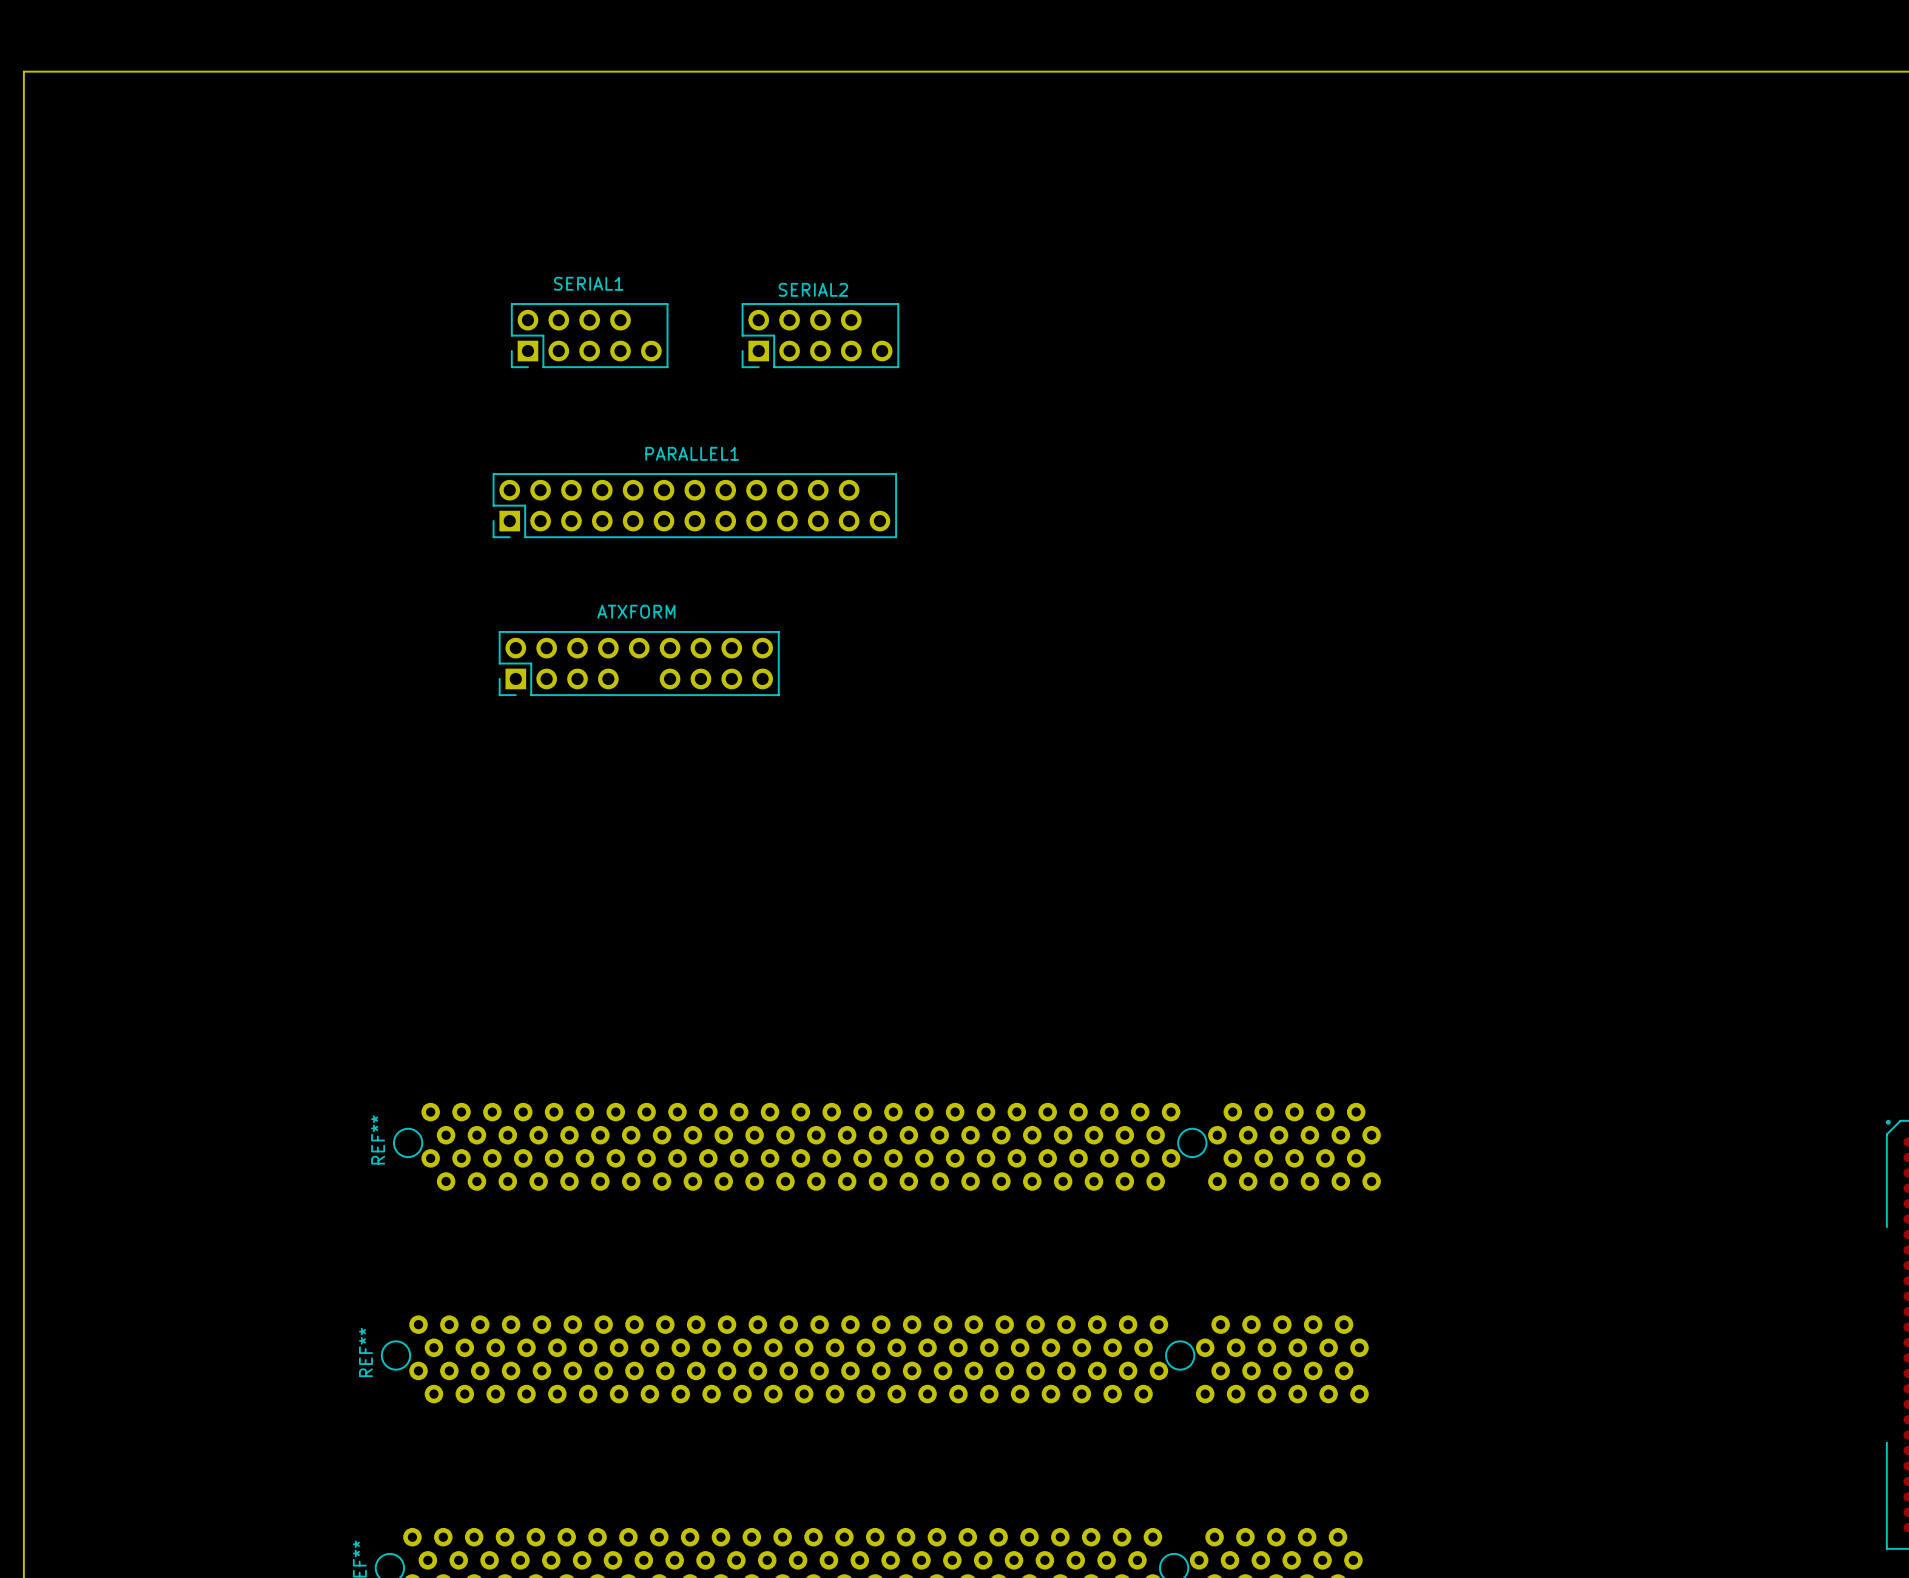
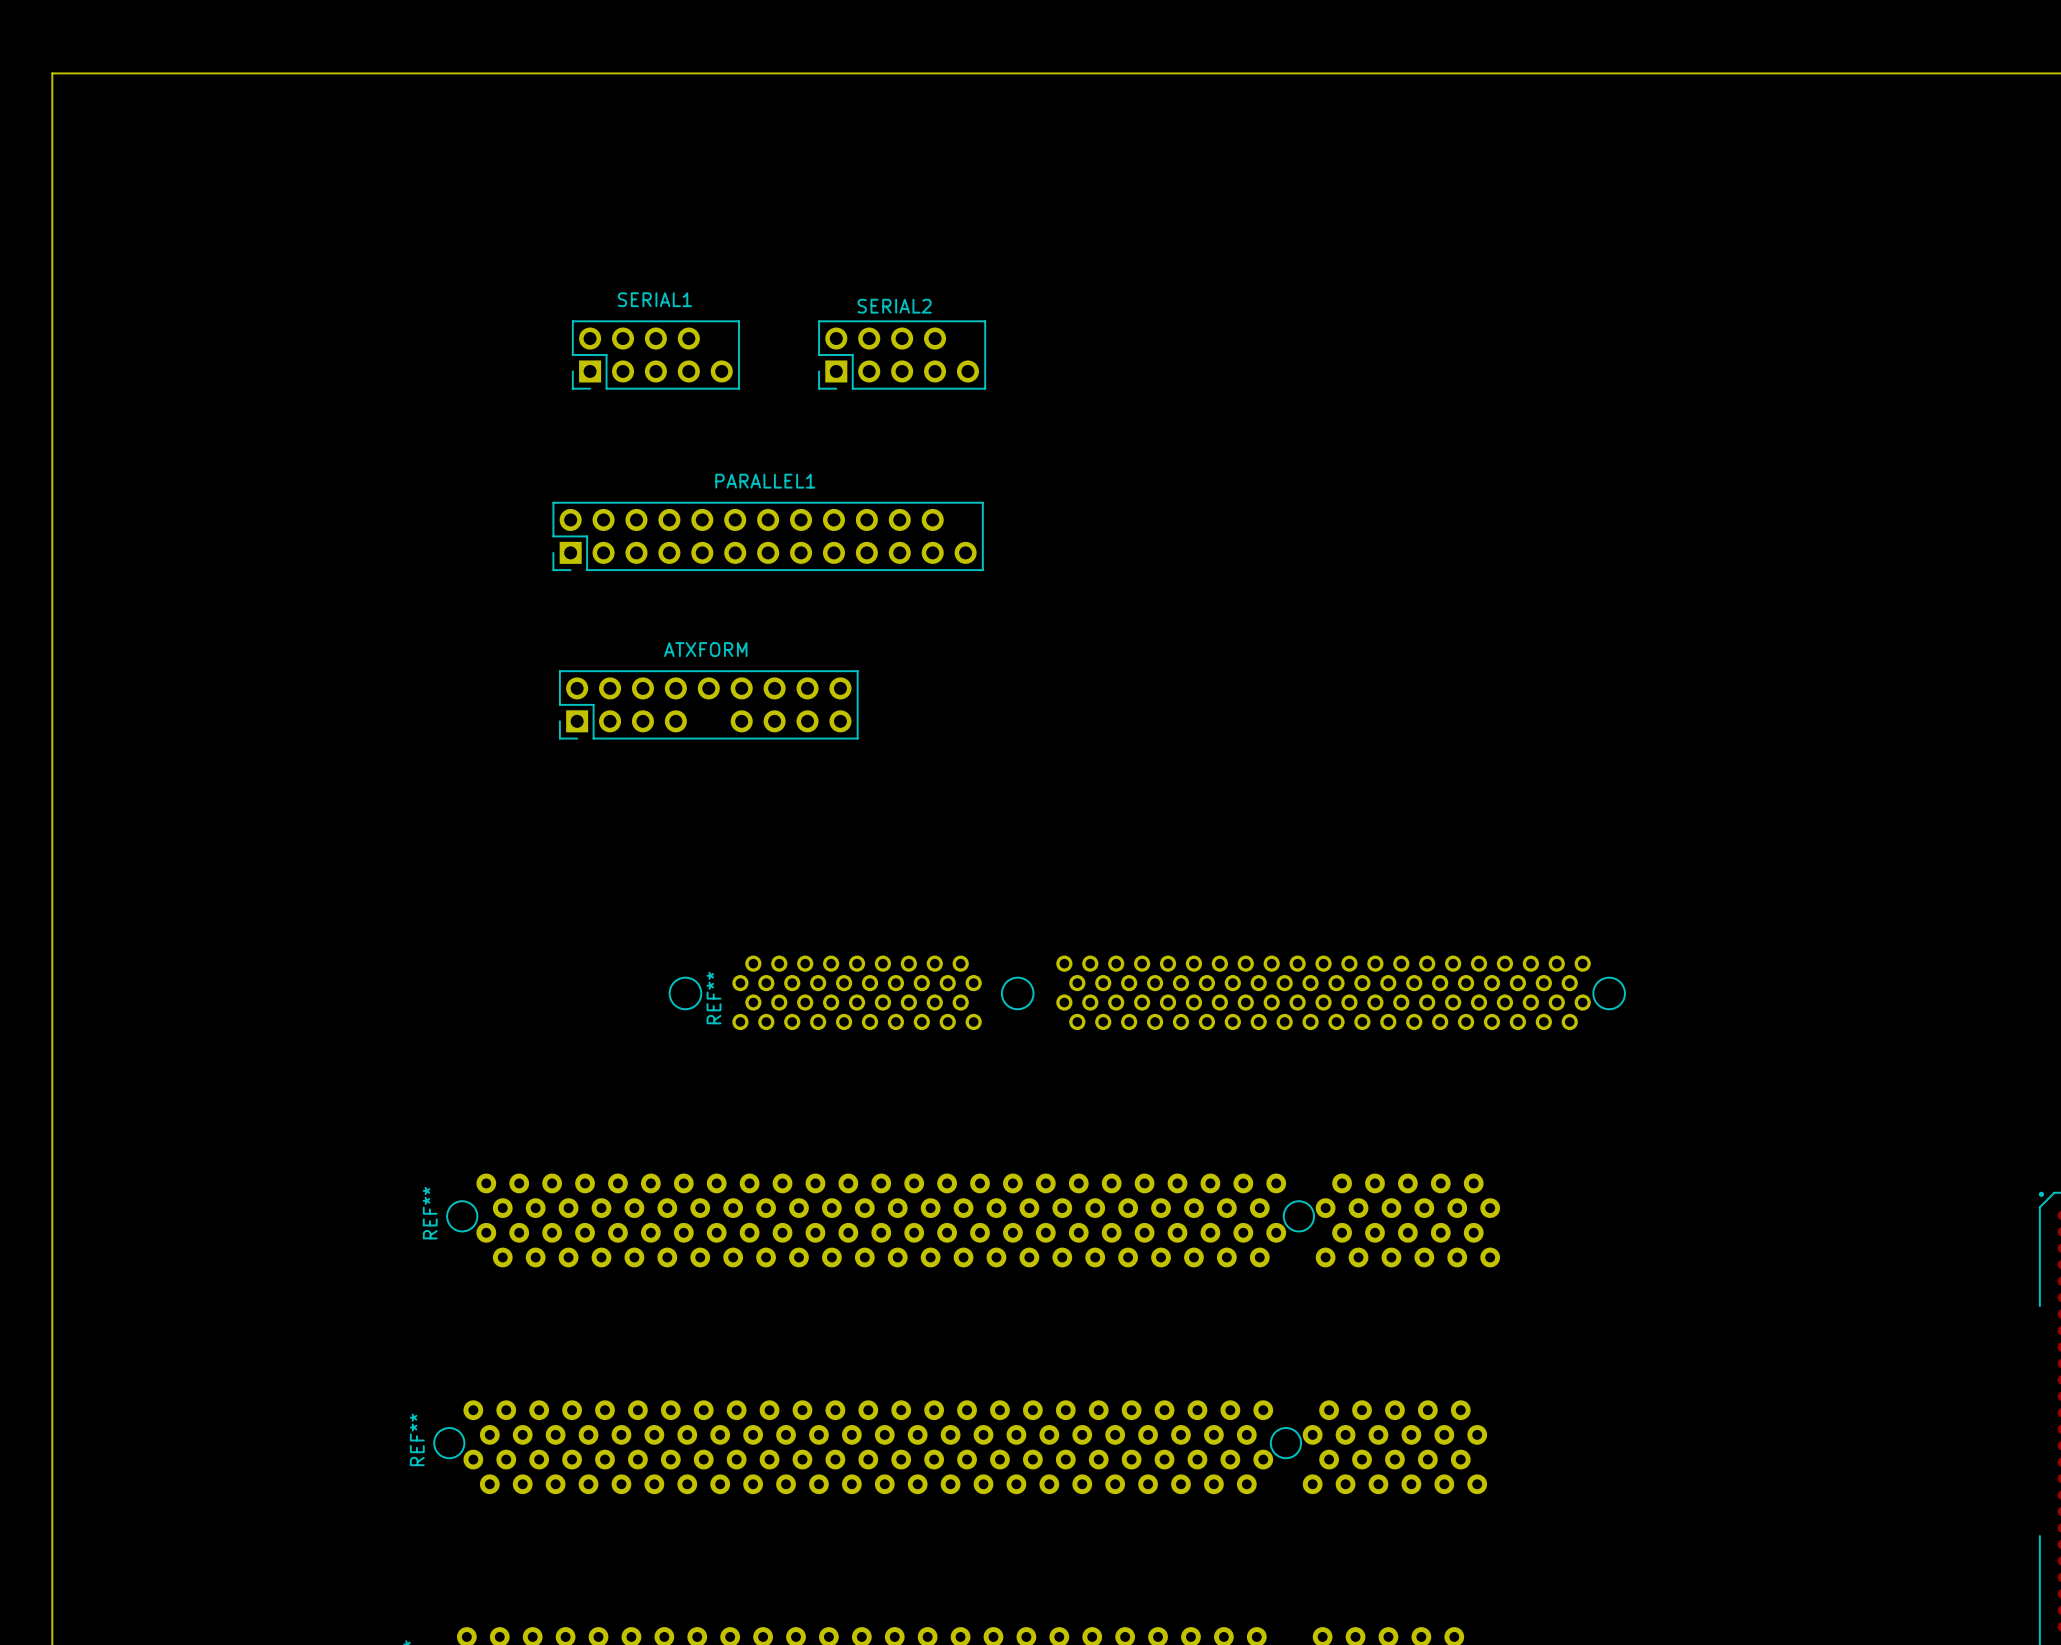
REF**: none -> (1147, 992)

